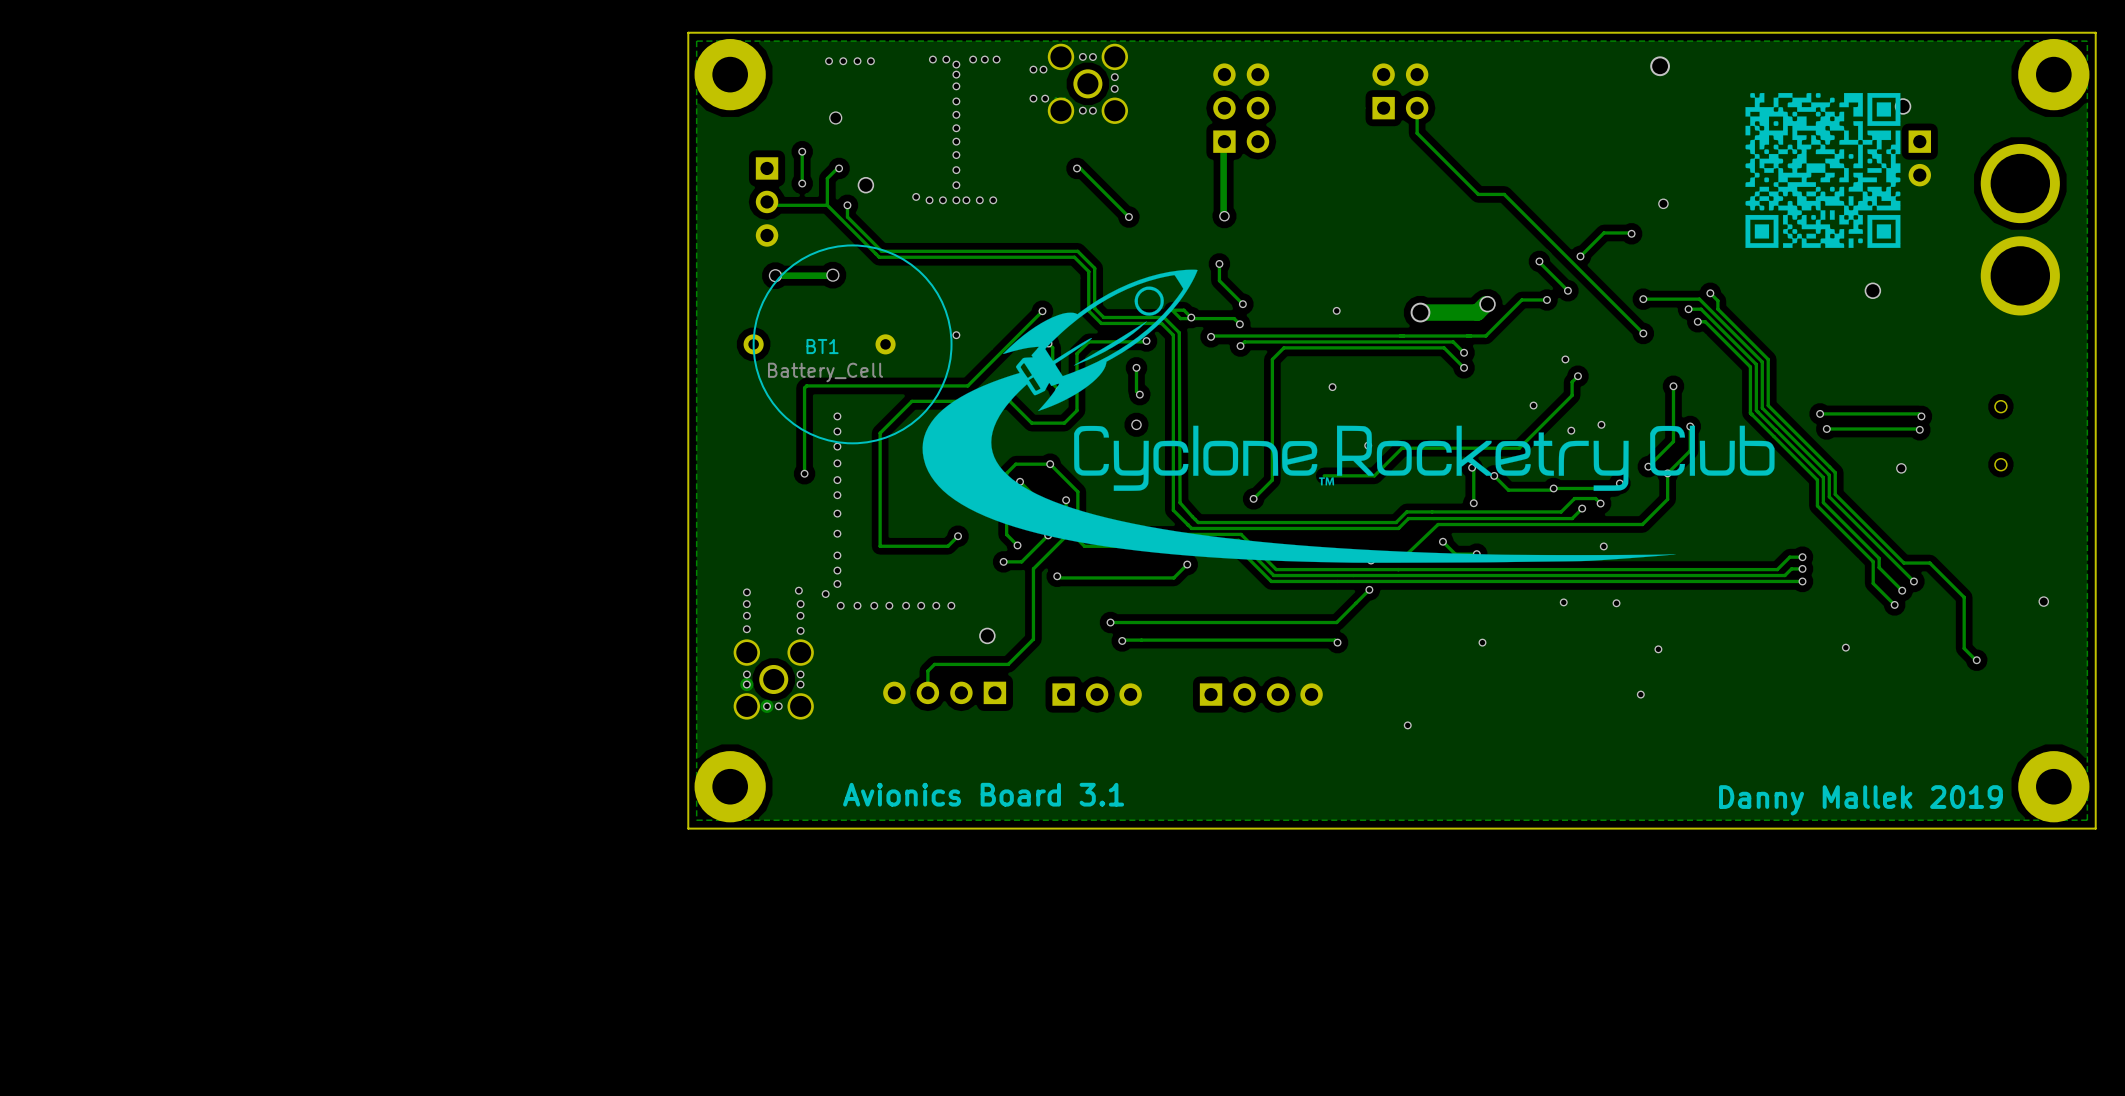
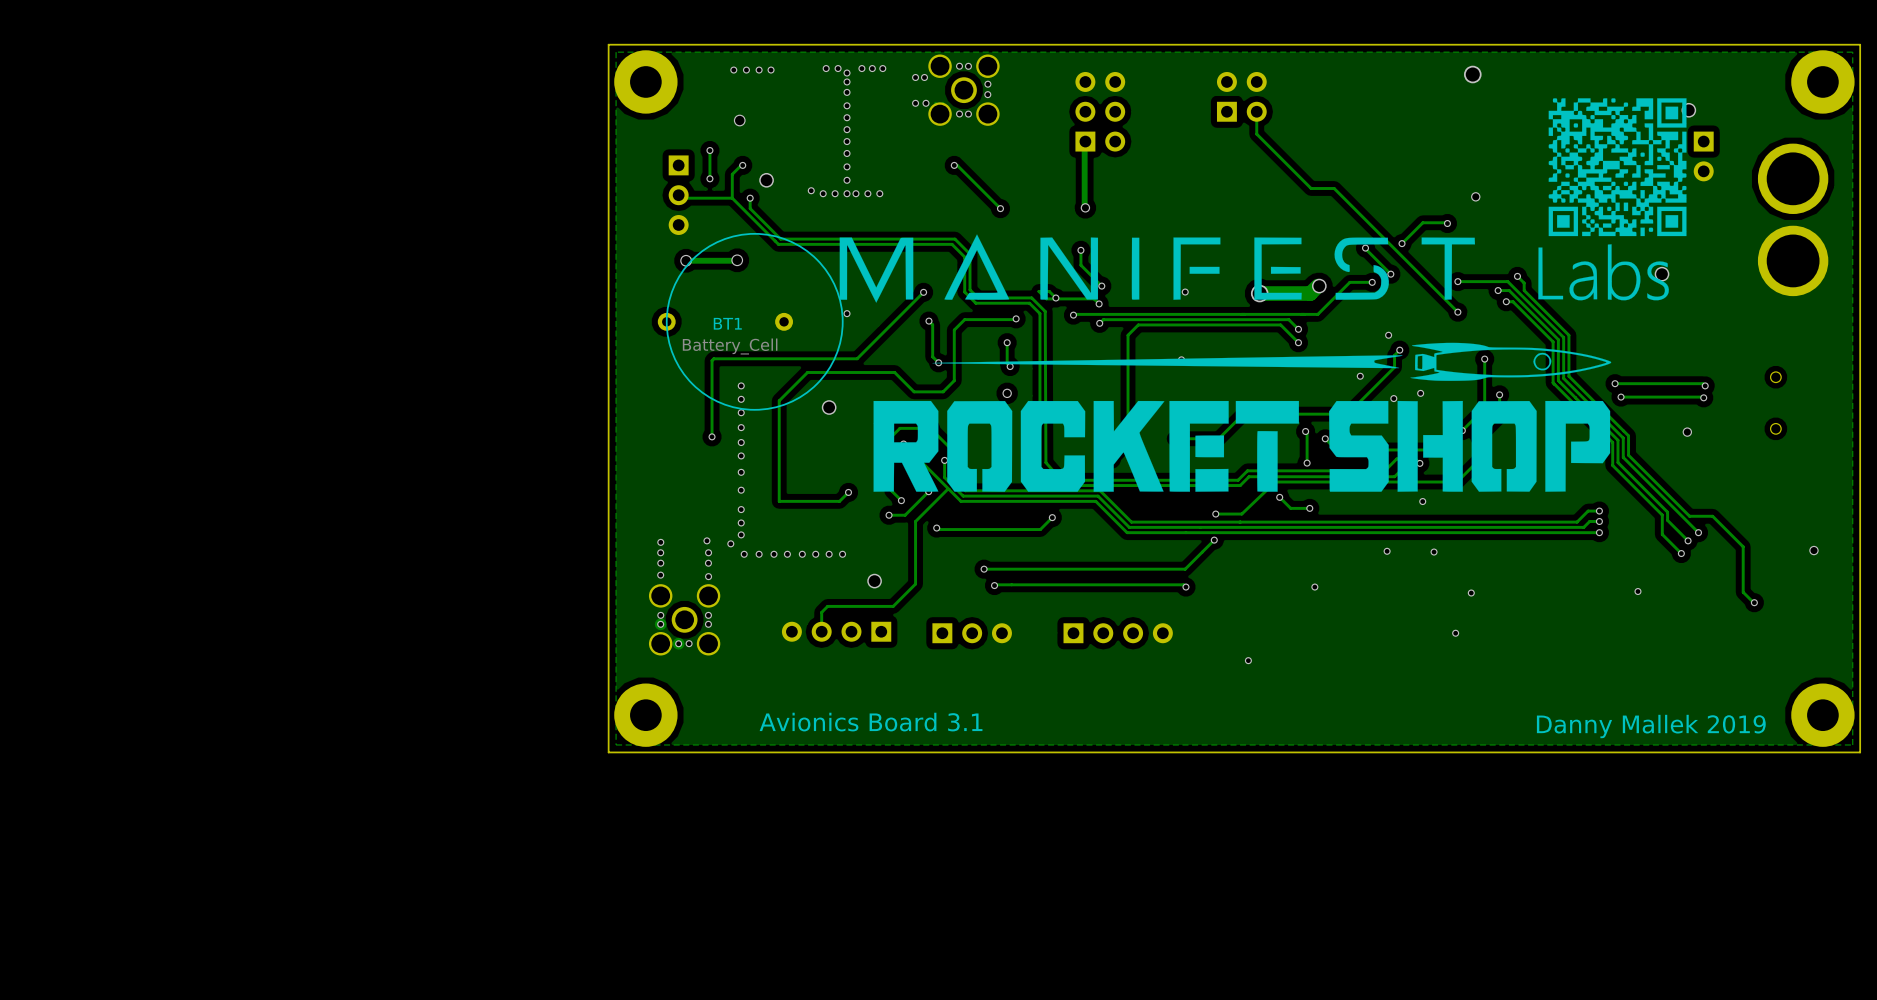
drawing: none -> [839, 234, 1669, 303]
drawing: [922, 269, 1775, 563] -> none
drawing: none -> [873, 342, 1612, 492]

